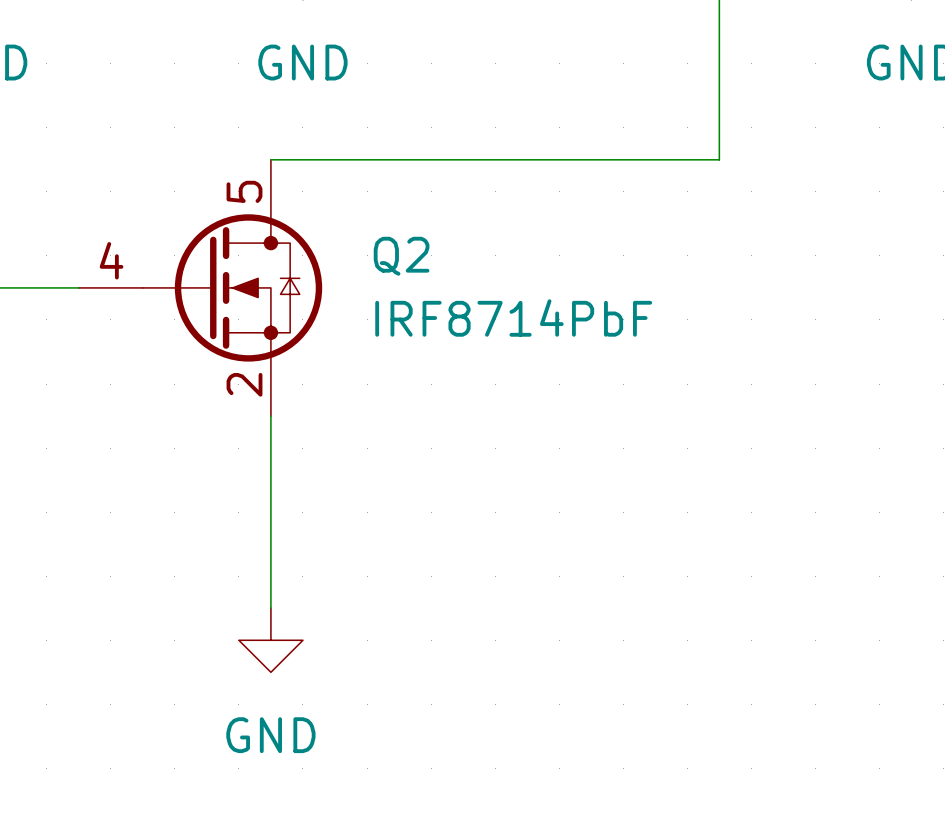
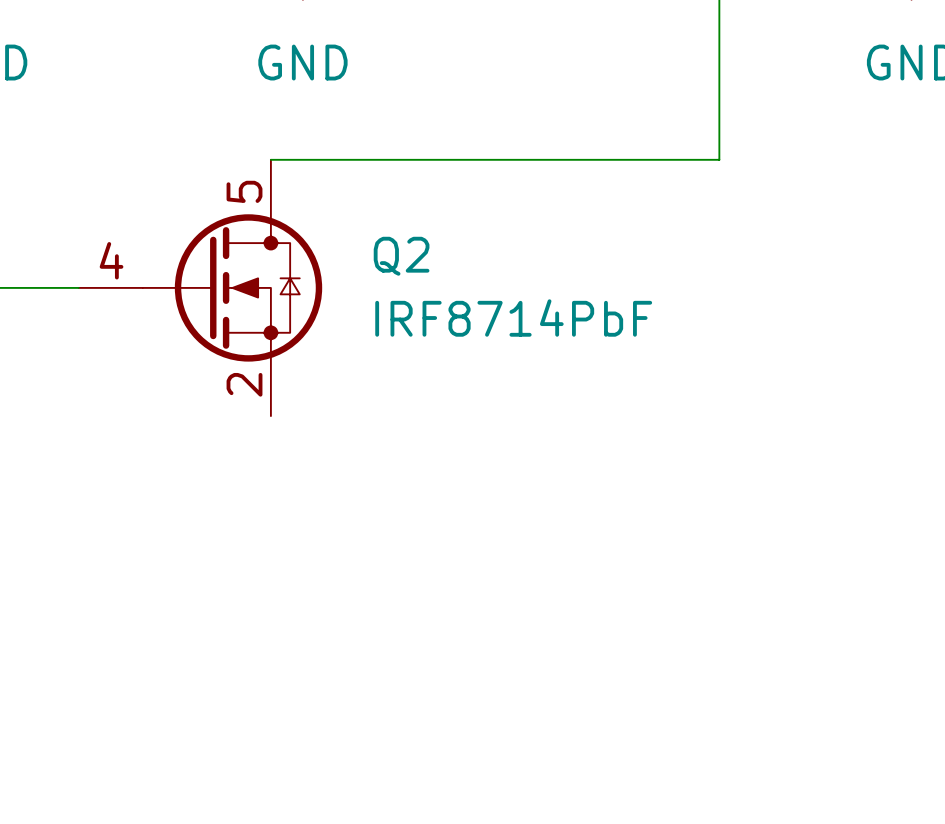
wire: (270, 416) (270, 608) -> none
power symbol: GND (270, 640) -> none

